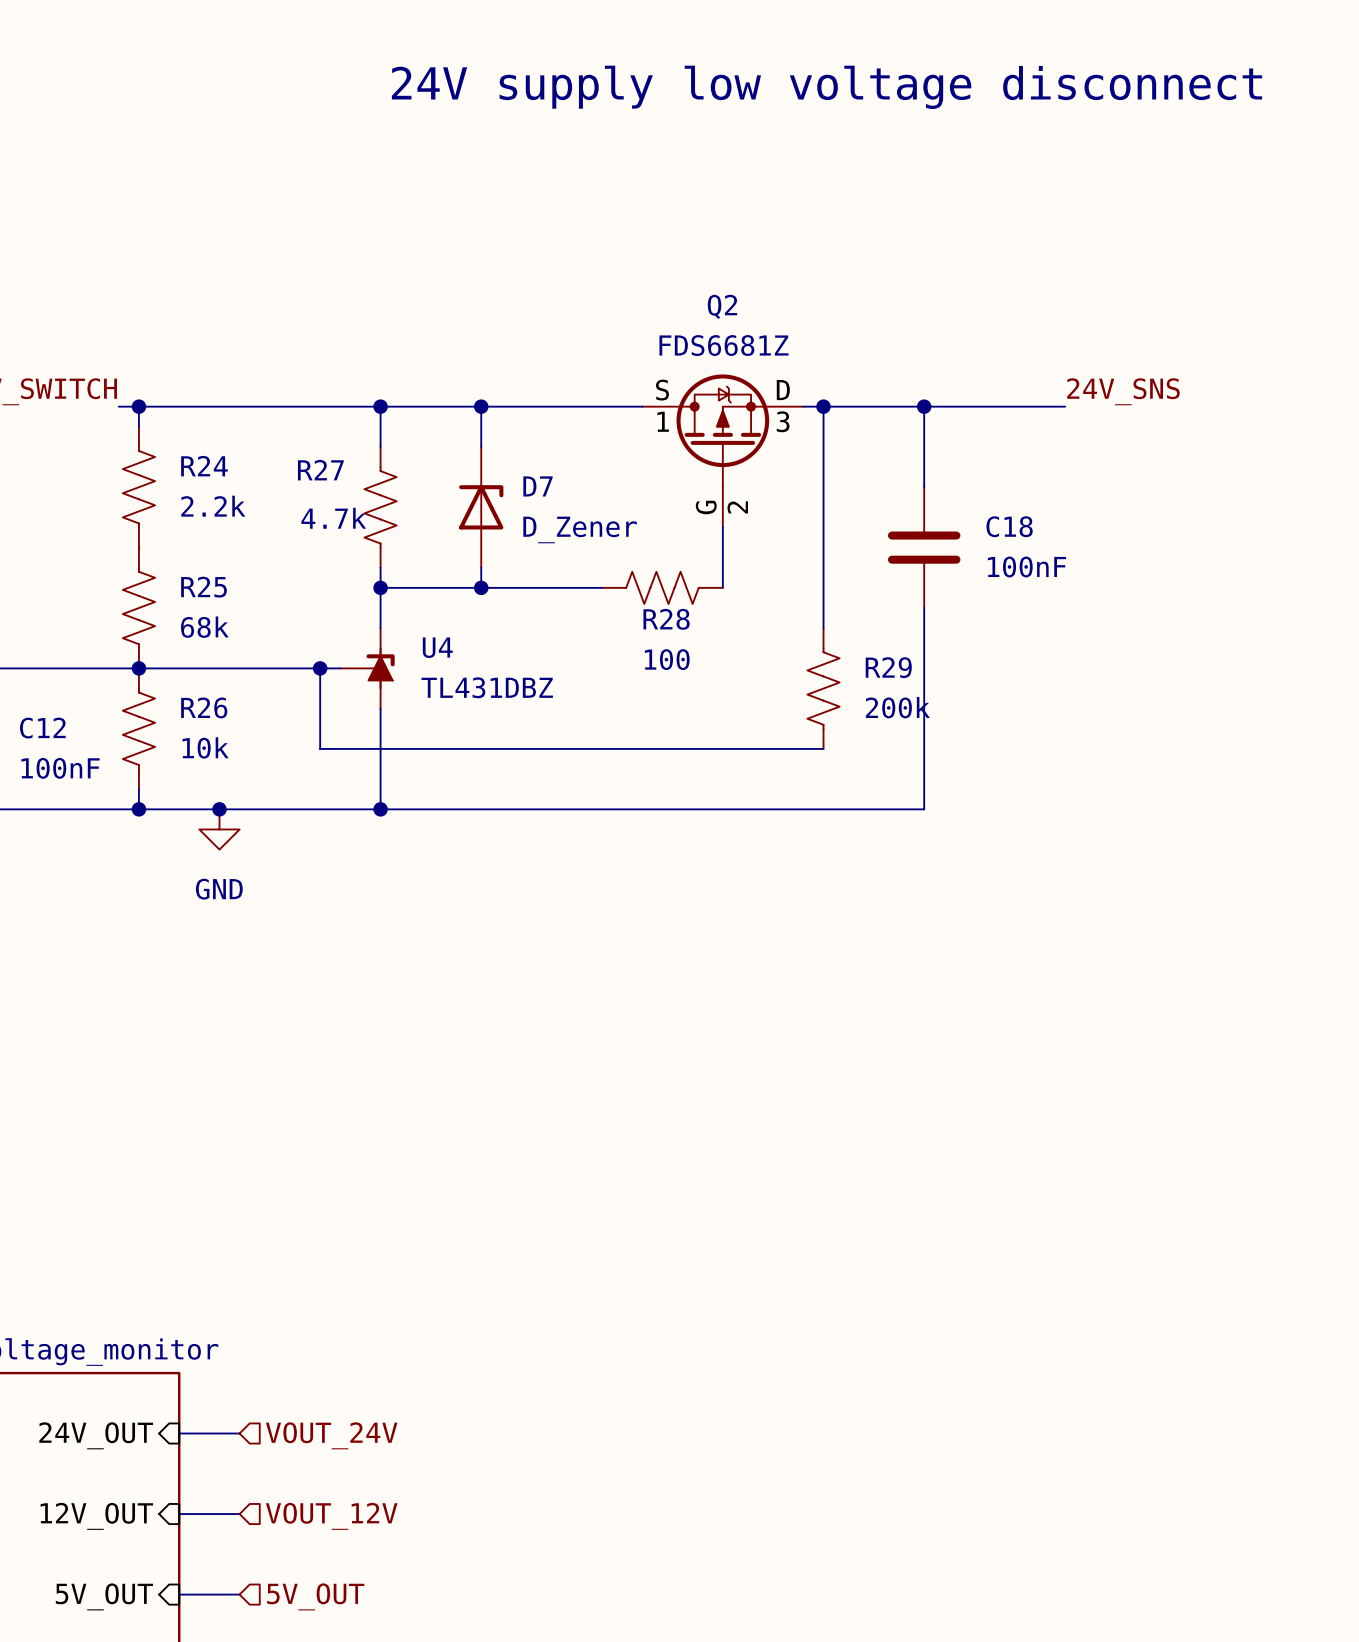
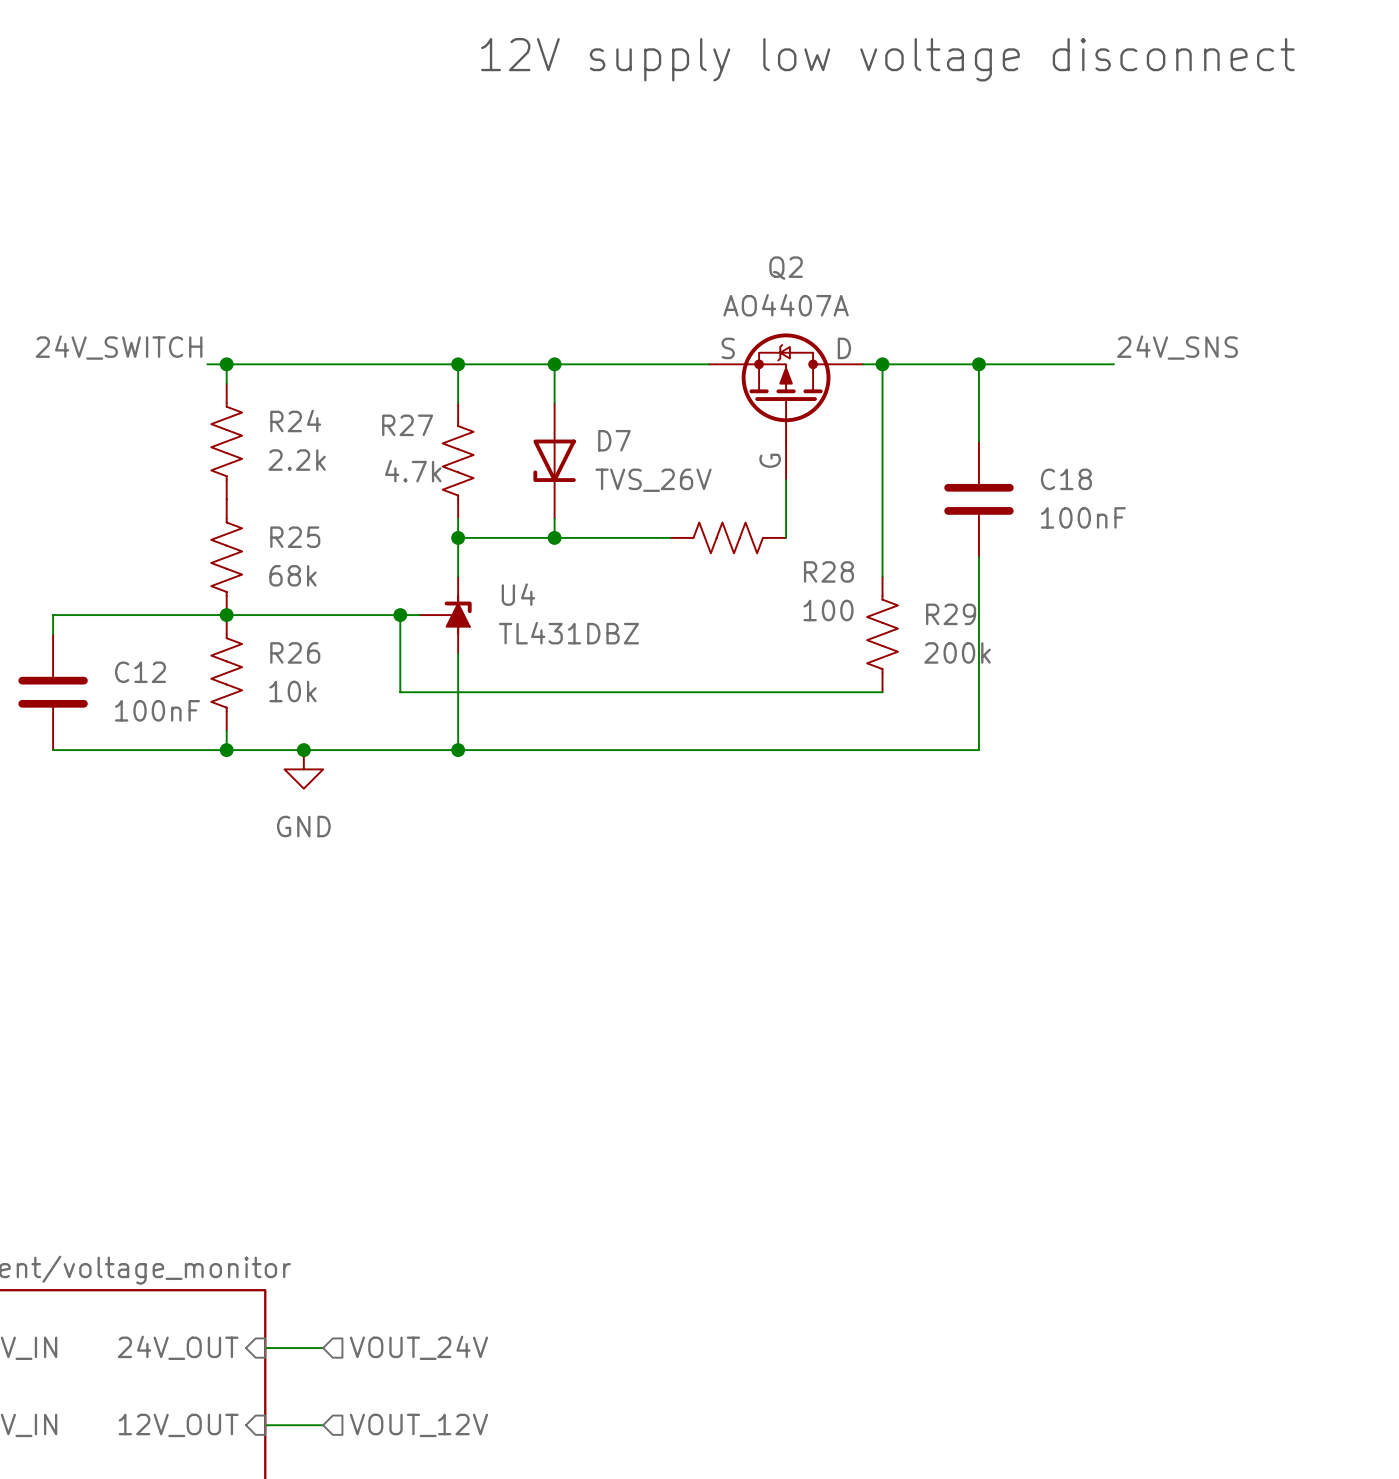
text: 24V supply low voltage disconnect (827, 87) -> 12V supply low voltage disconnect (887, 59)
Q2 value: FDS6681Z (723, 345) -> AO4407A (786, 305)
Q2 symbol: [642, 374, 804, 528] -> [708, 333, 864, 481]
D7 rotation: 0° (481, 507) -> 180° (554, 460)
D7 value: D_Zener (580, 529) -> TVS_26V (653, 480)
R28 name position: R28 (666, 619) -> R28 (828, 571)
R28 value position: 100 (667, 659) -> 100 (828, 610)

